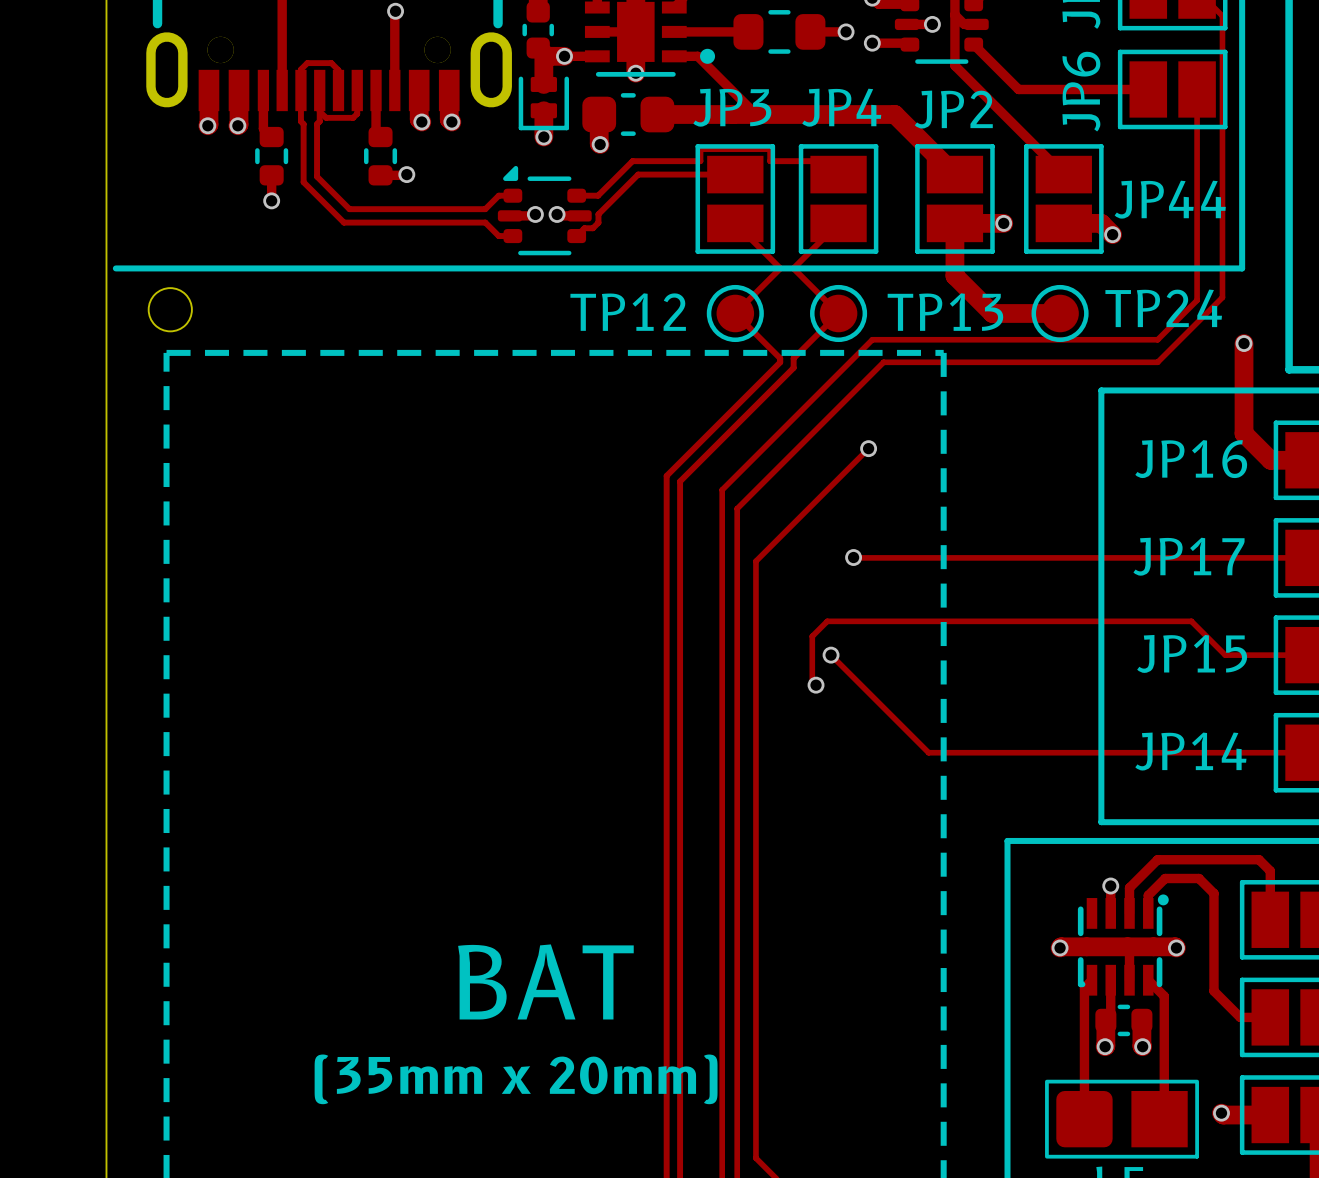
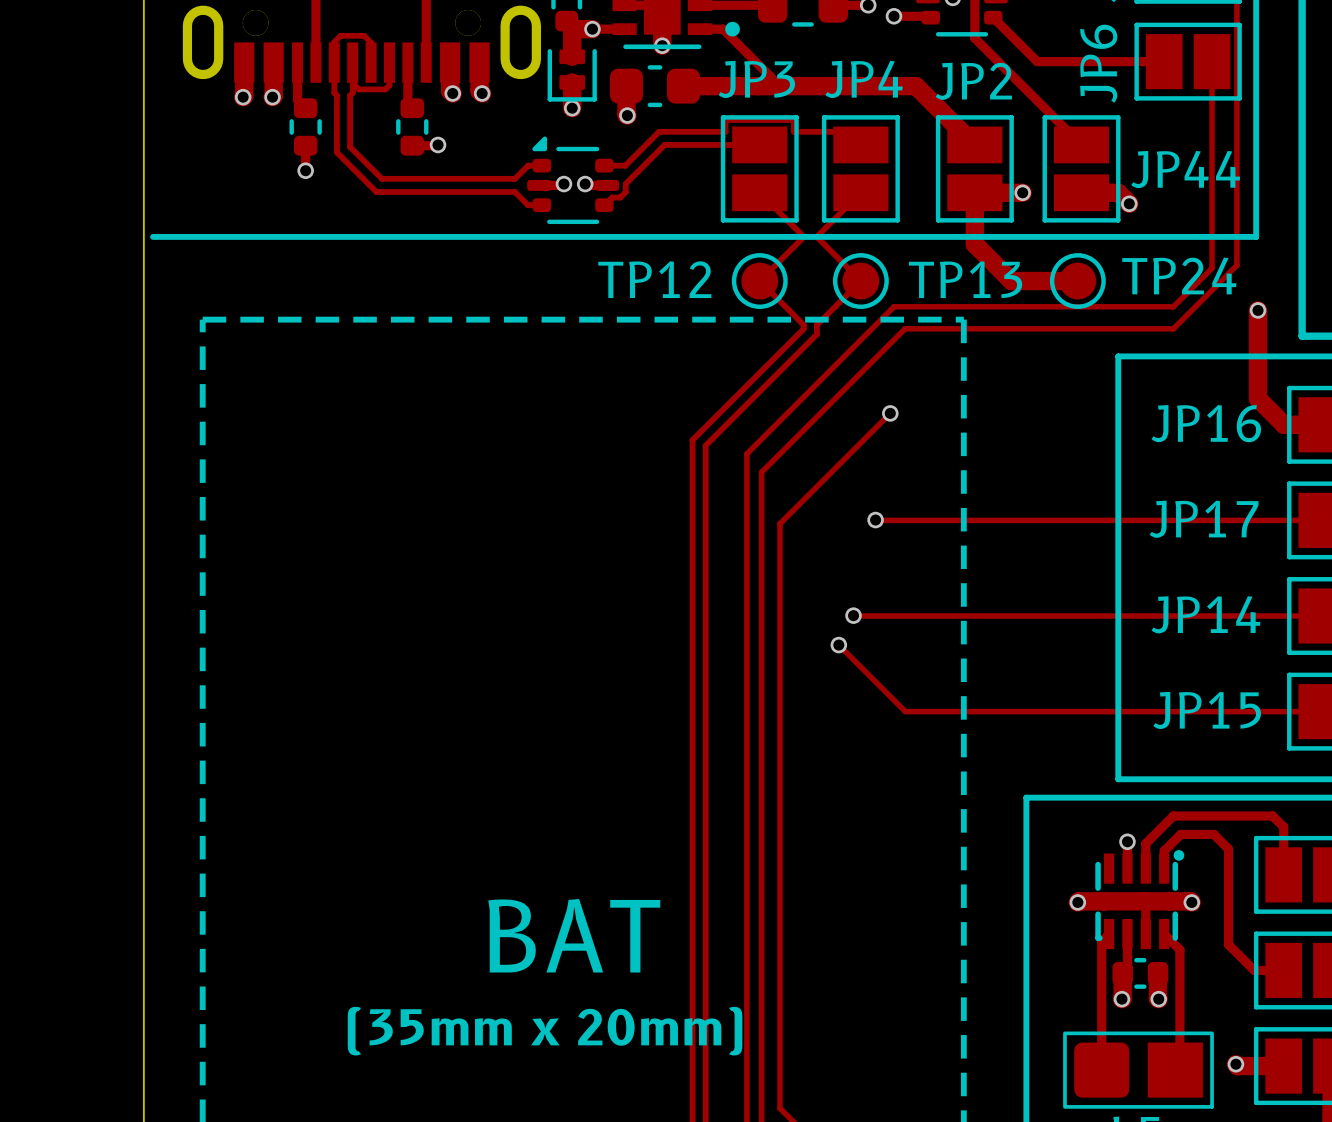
round board edge: [147, 287, 193, 333] -> none
JP15 name: JP15 (1192, 653) -> JP14 (1205, 614)
track: (831, 655) (928, 752) (1304, 752) -> (838, 645) (905, 711) (1316, 711)
track: (1304, 655) (1225, 655) (1191, 621) (827, 621) (812, 636) (812, 681) (816, 685) -> (1316, 616) (853, 616)
JP14 name: JP14 (1190, 751) -> JP15 (1207, 710)

